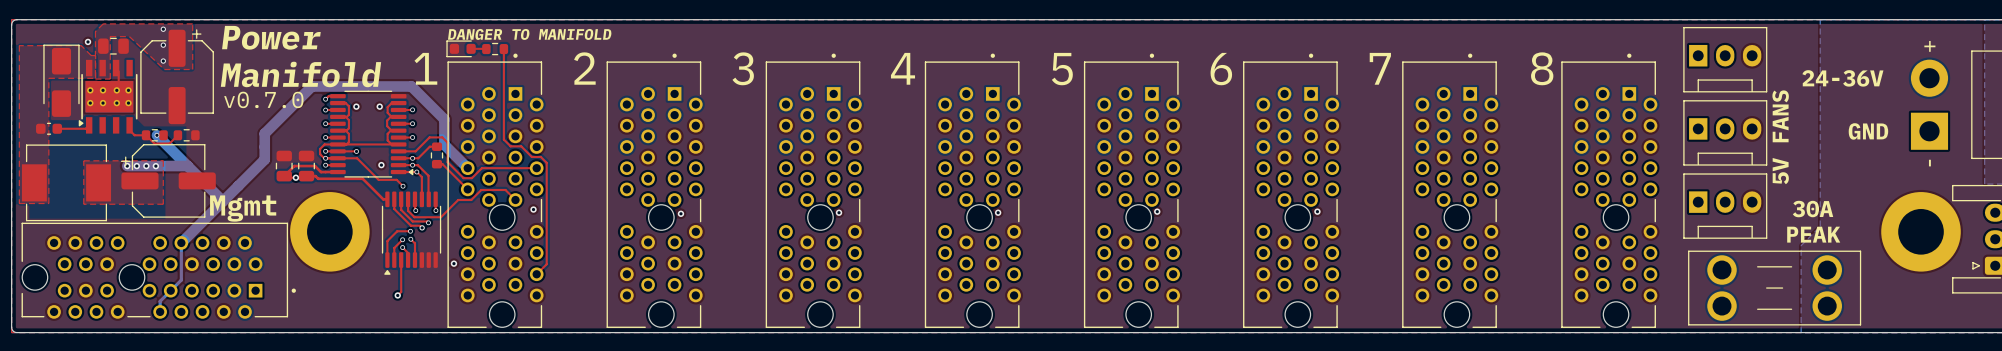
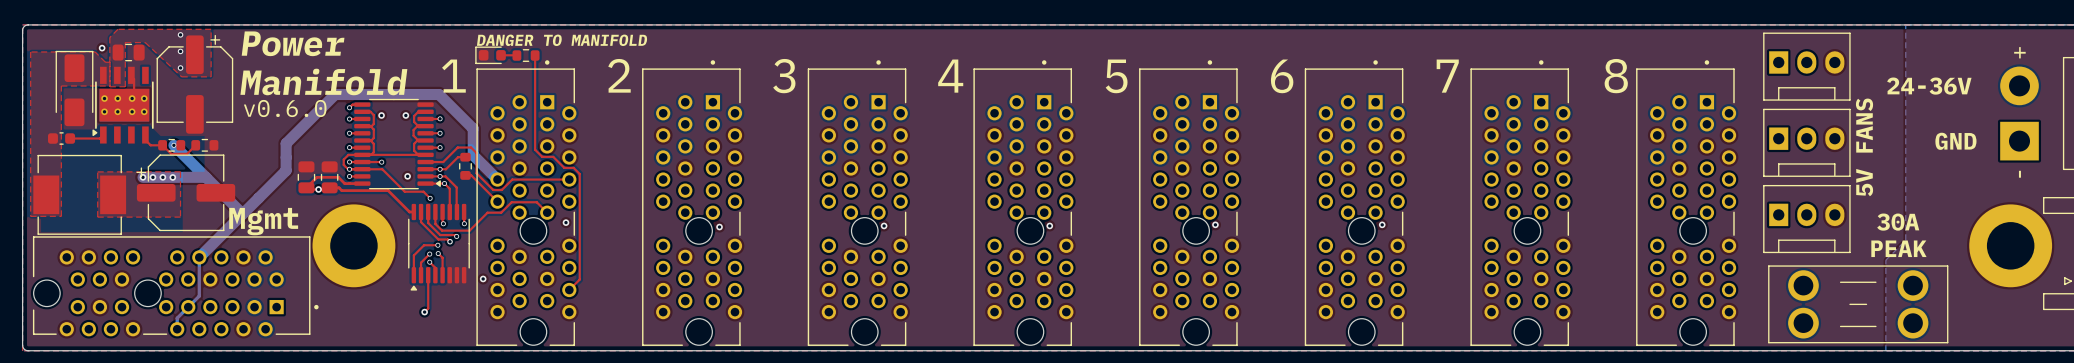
text: v0.7.0 (263, 99) -> v0.6.0 (285, 108)

